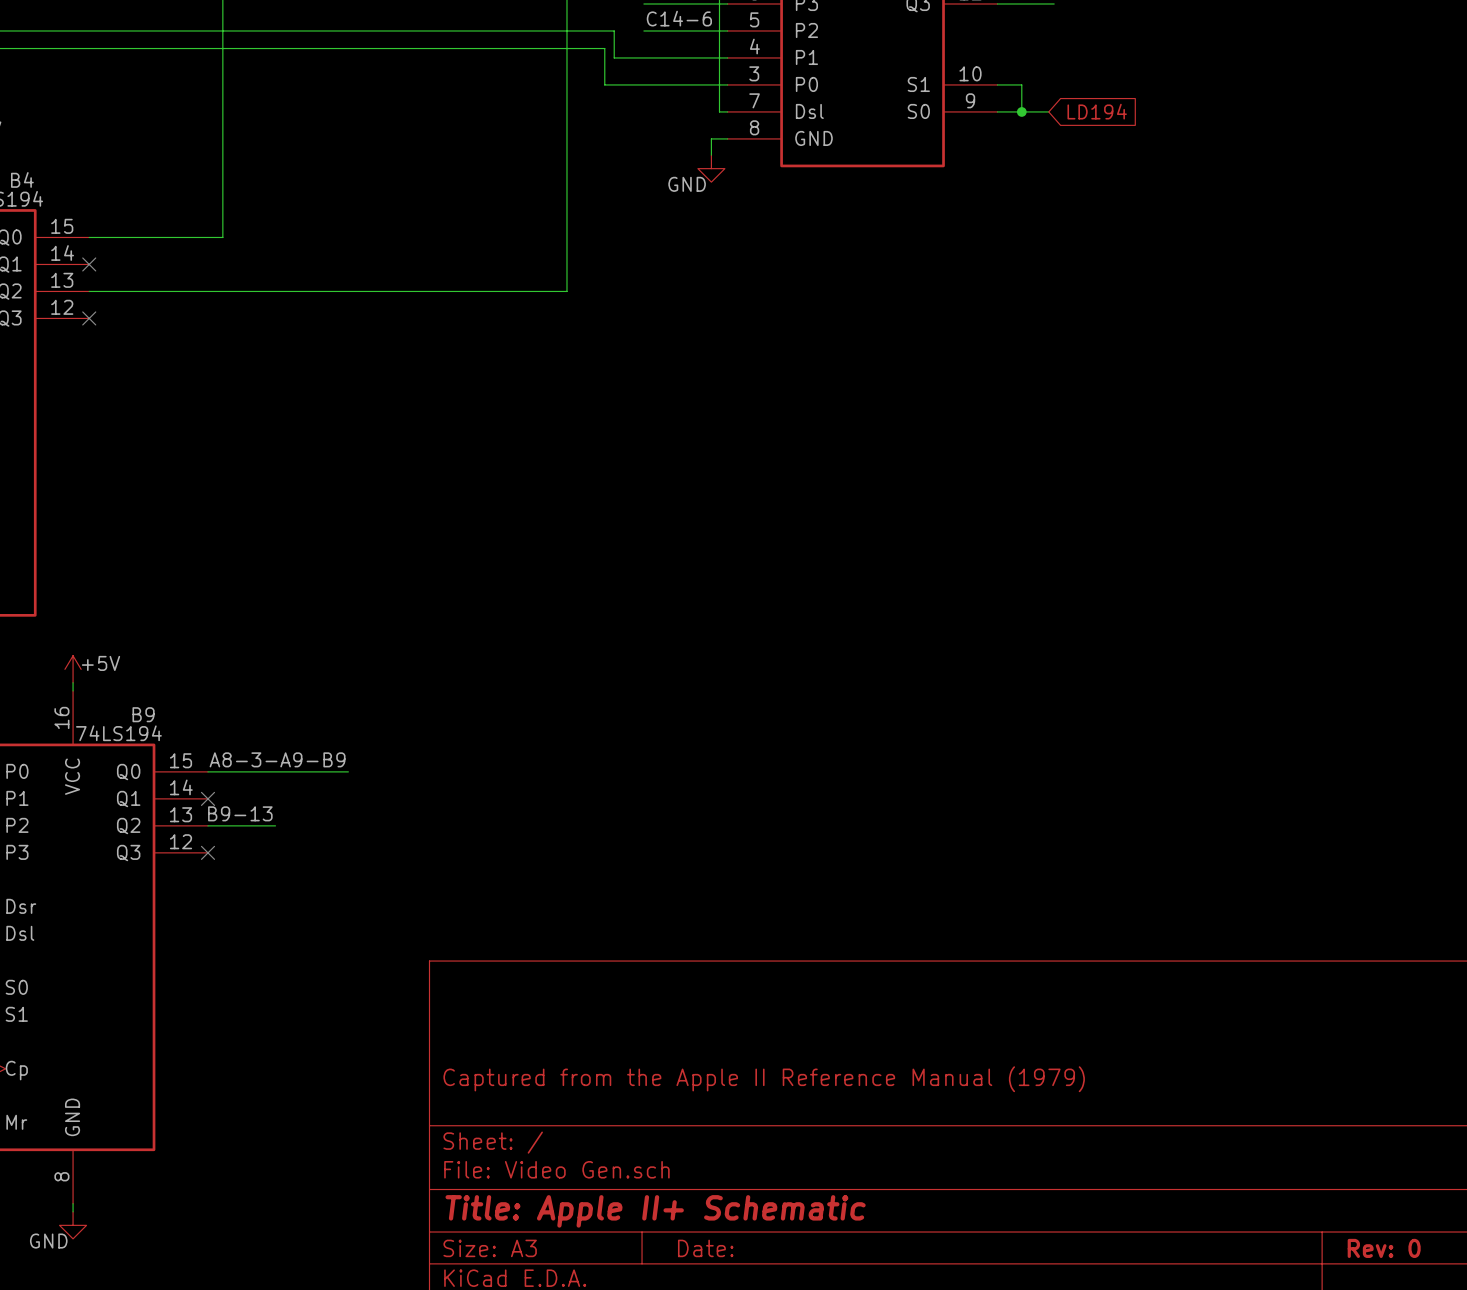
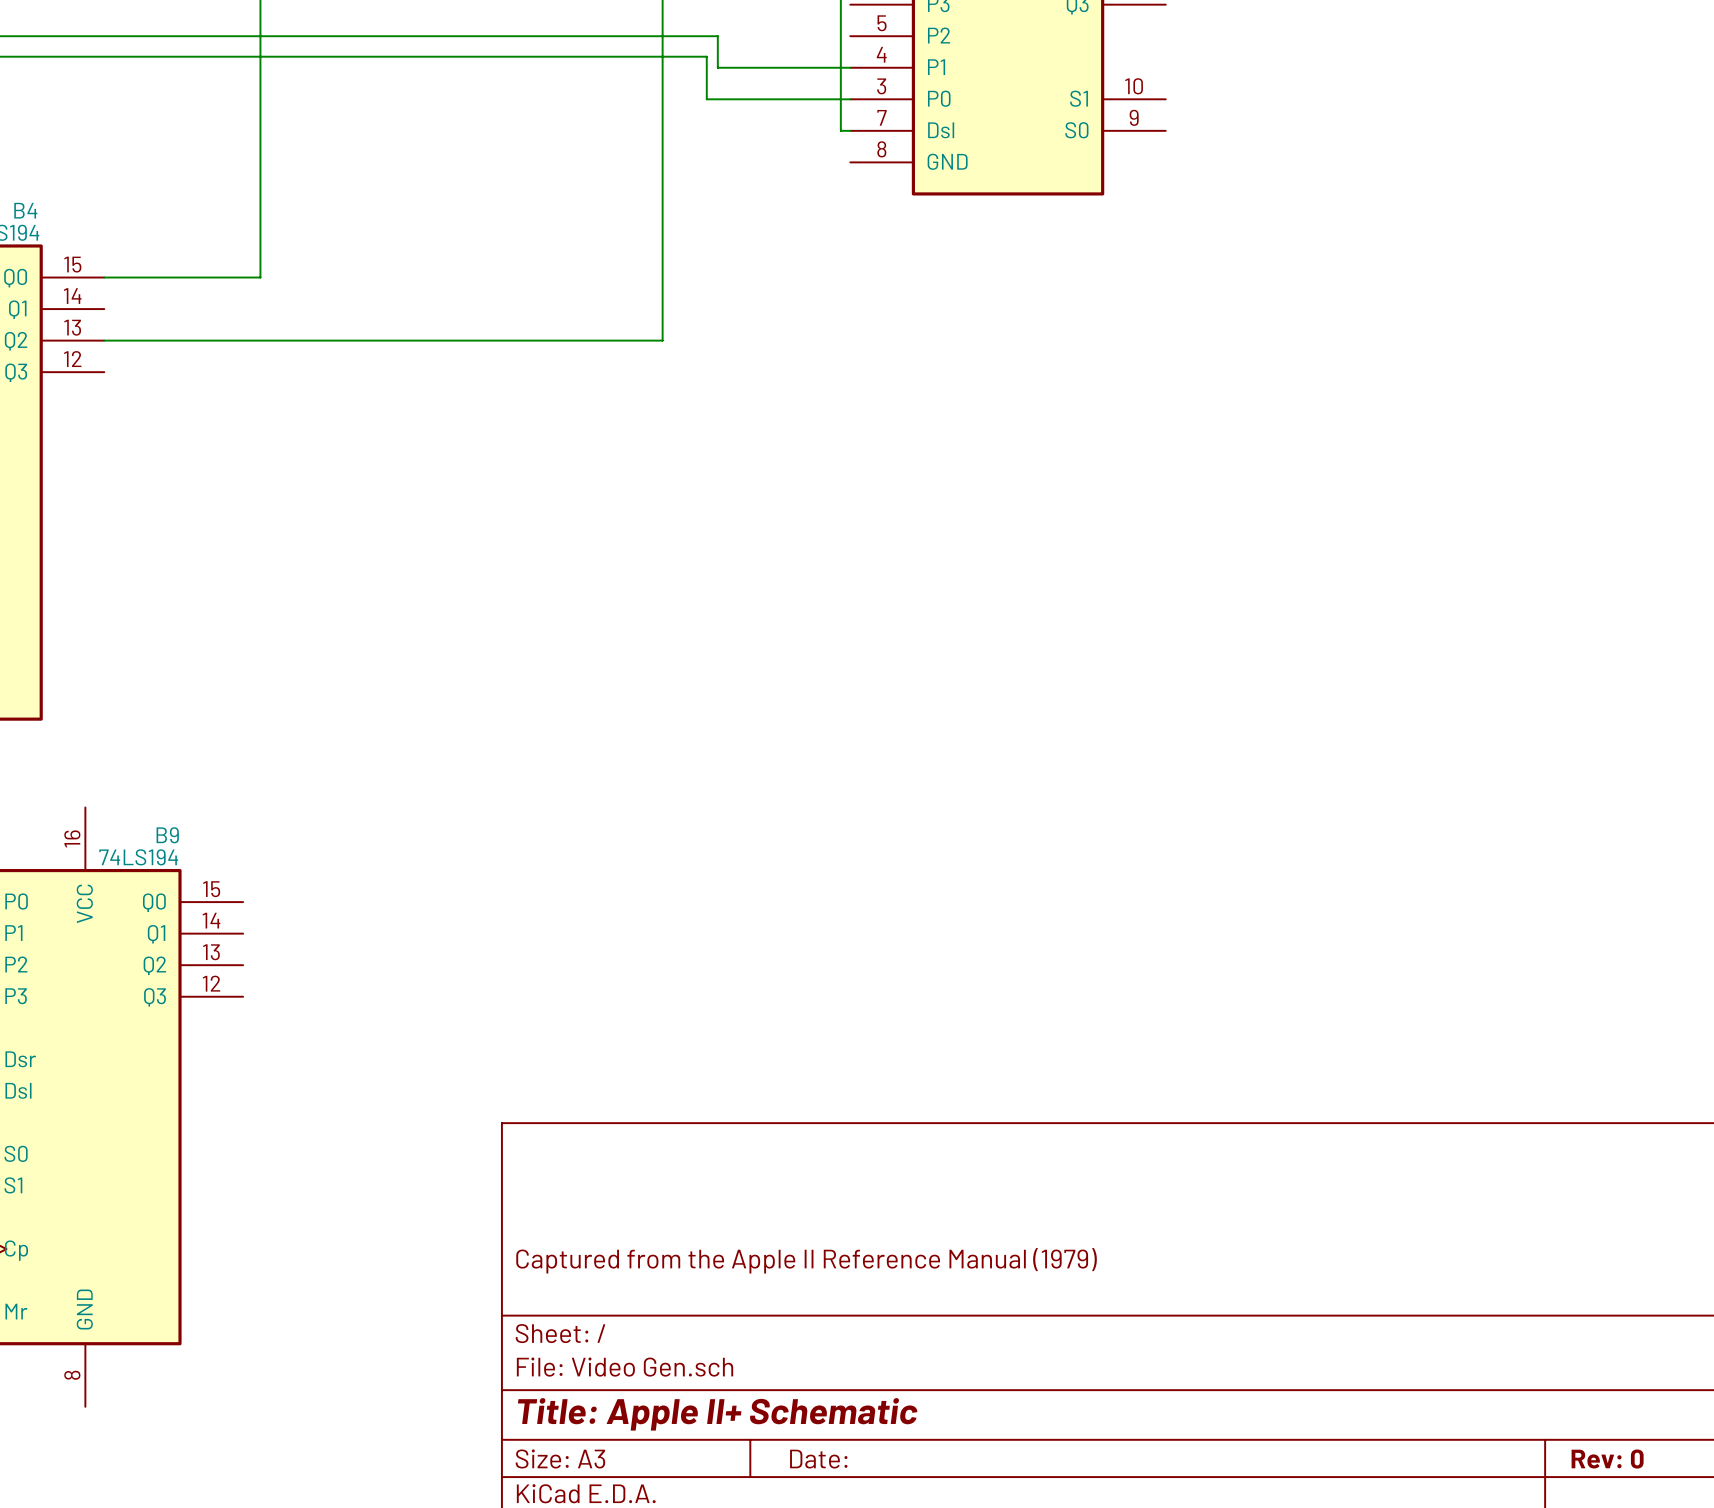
wire: (643, 3) (727, 3) -> none
wire: (997, 3) (1054, 3) -> none
label: C14-6 (679, 18) -> none
wire: (643, 30) (727, 30) -> none
wire: (997, 84) (1021, 84) (1021, 111) -> none
wire: (997, 111) (1048, 111) -> none
junction: (1021, 111) -> none
global label: LD194 (1097, 111) -> none
wire: (727, 138) (711, 138) (711, 155) -> none
power symbol: GND (711, 168) -> none
no-connect mark: (89, 264) -> none
no-connect mark: (89, 318) -> none
power symbol: +5V (73, 669) -> none
wire: (73, 682) (73, 690) -> none
label: A8-3-A9-B9 (277, 759) -> none
wire: (208, 771) (348, 771) -> none
no-connect mark: (208, 798) -> none
label: B9-13 (240, 813) -> none
wire: (208, 825) (275, 825) -> none
no-connect mark: (208, 852) -> none
wire: (73, 1203) (73, 1211) -> none
power symbol: GND (73, 1225) -> none

